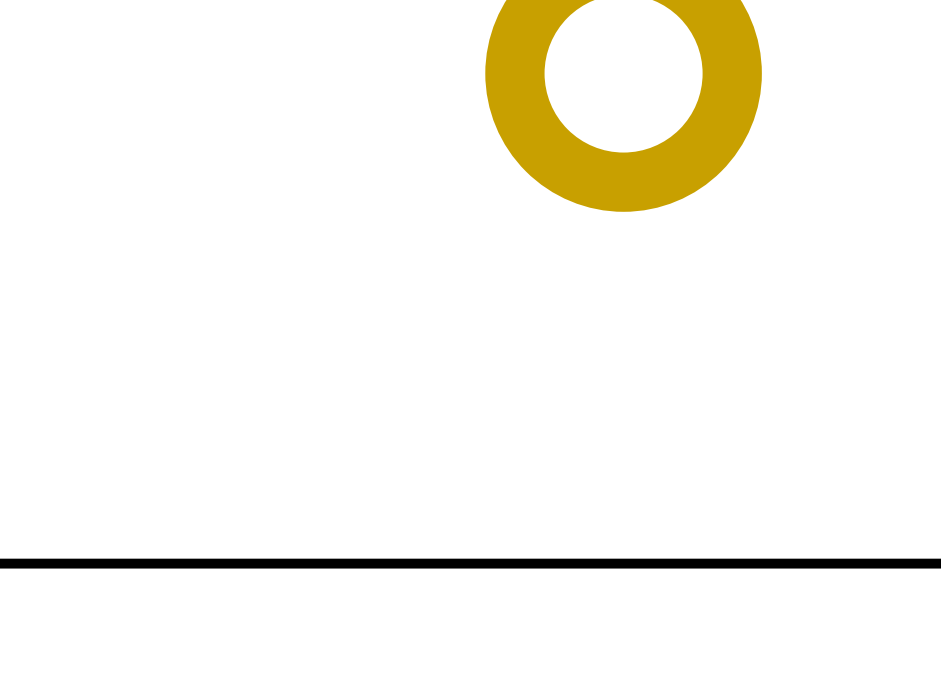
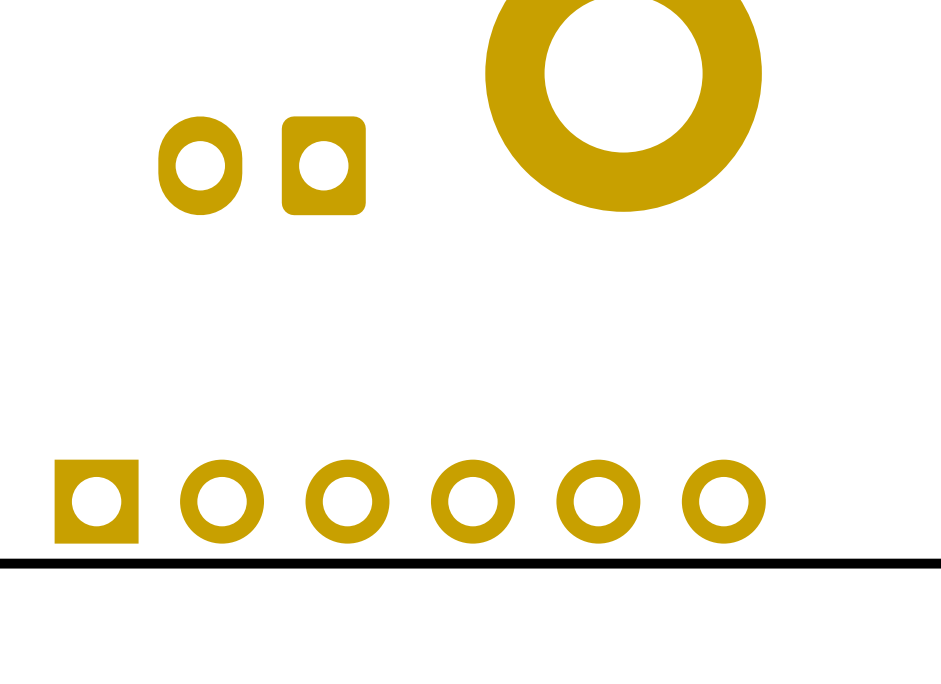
part: none -> (262, 165)
part: none -> (410, 501)

